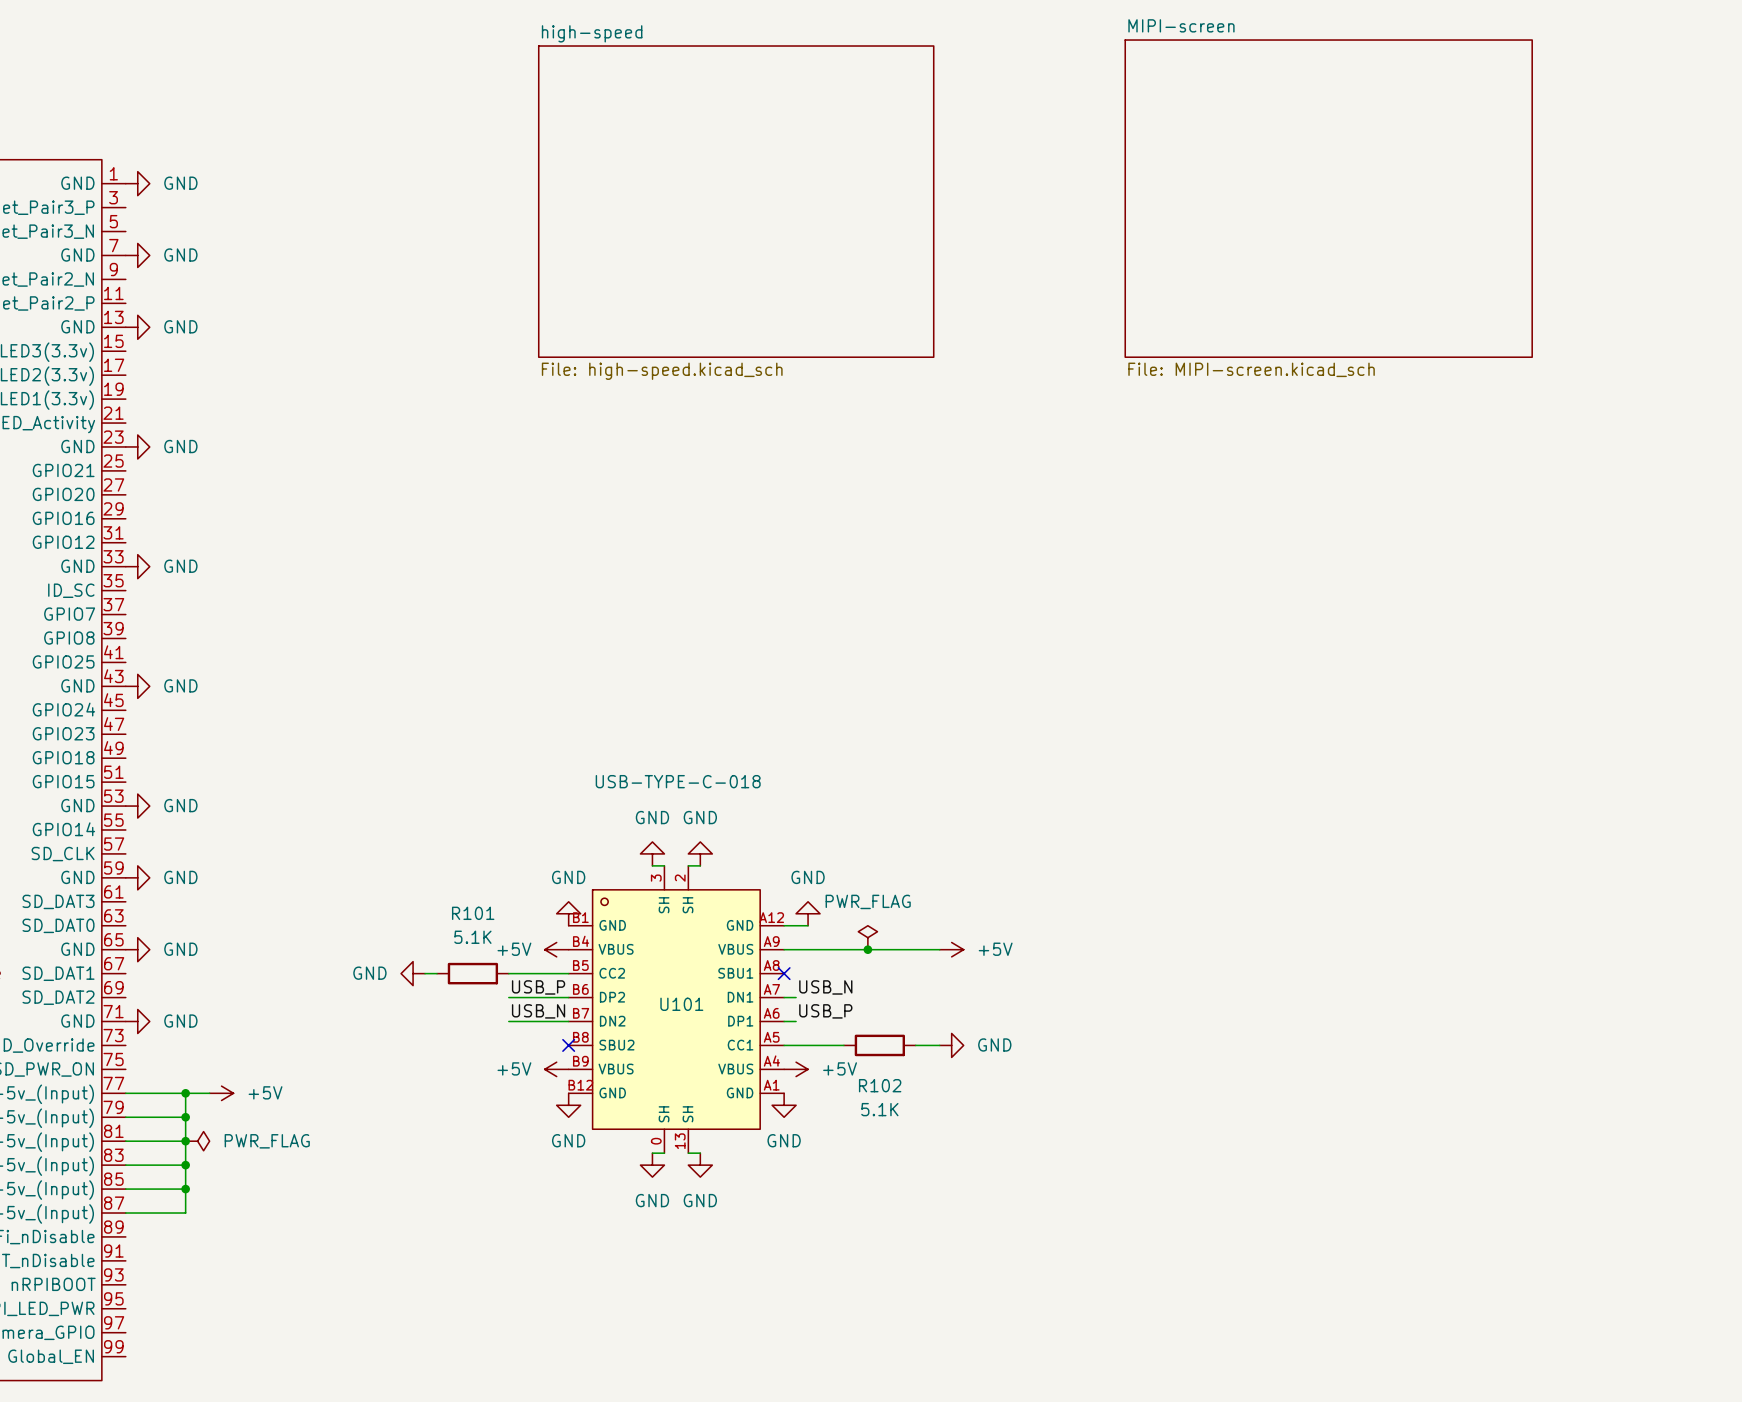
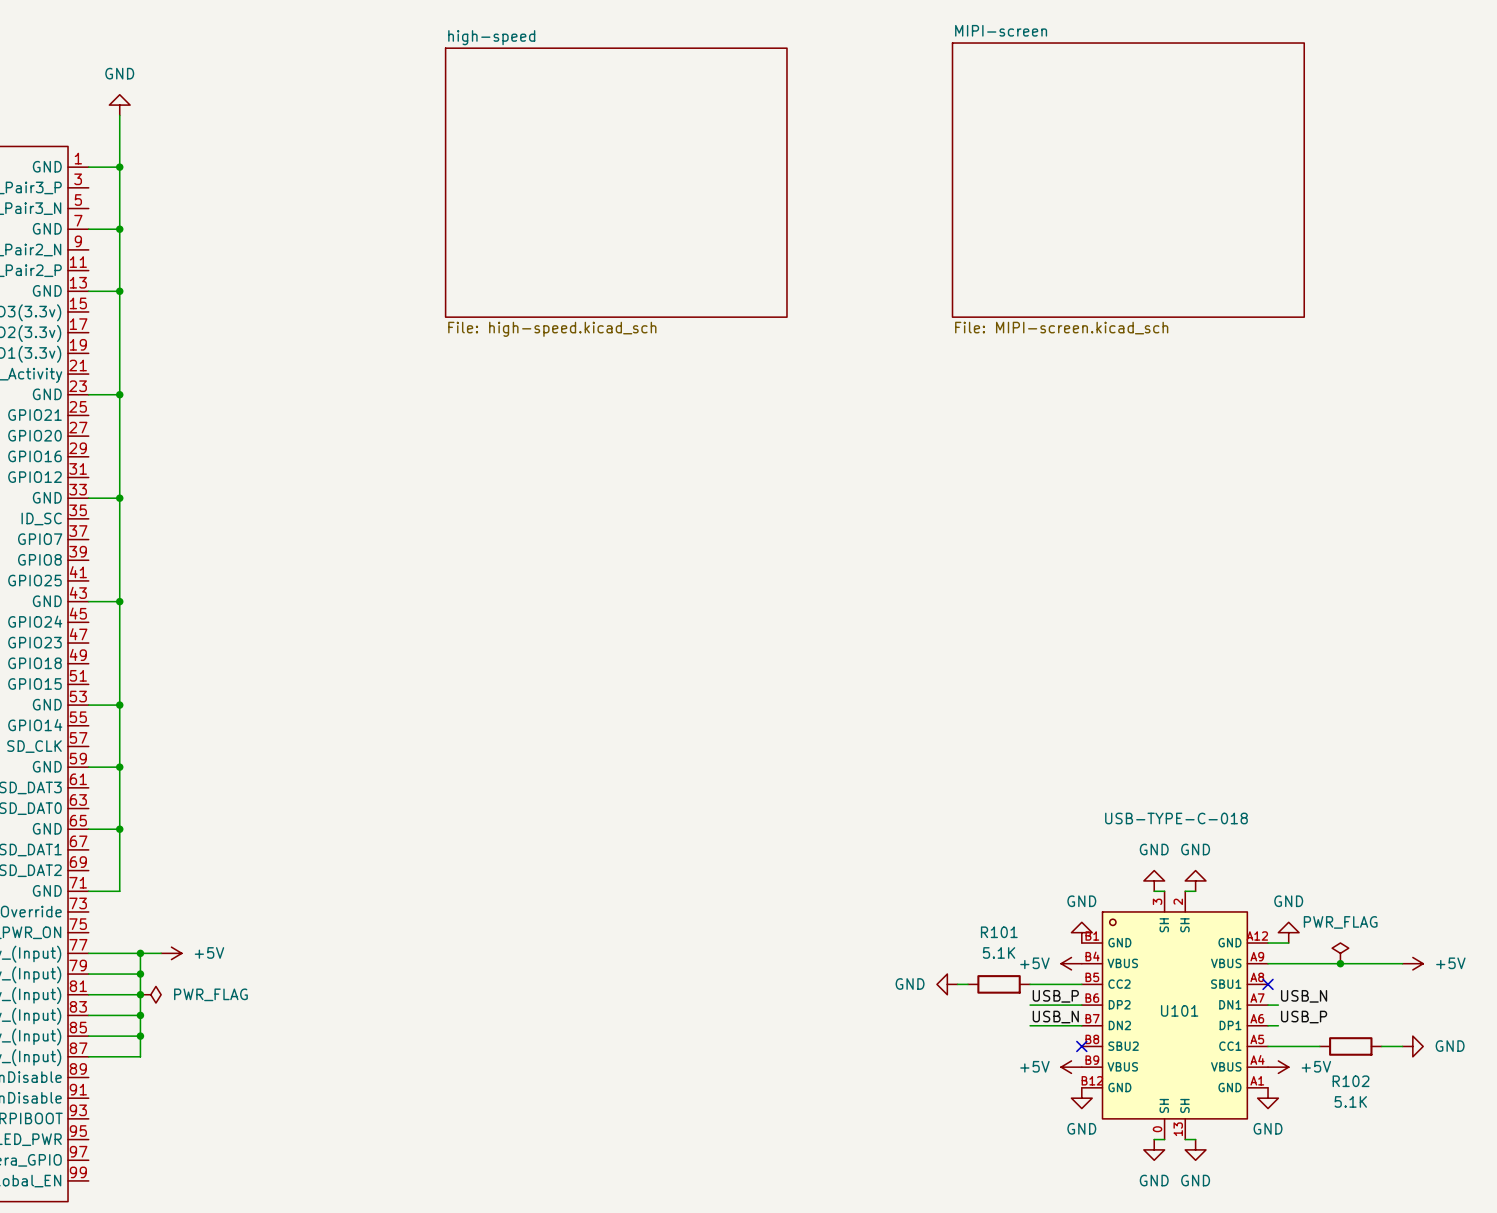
power symbol: none -> GND (119, 105)
wire: none -> (119, 115) (119, 891) (88, 891)
wire: none -> (88, 167) (119, 167)
power symbol: GND (137, 183) -> none
junction: none -> (119, 167)
wire: none -> (88, 229) (119, 229)
power symbol: GND (137, 255) -> none
junction: none -> (119, 229)
wire: none -> (88, 291) (119, 291)
power symbol: GND (137, 327) -> none
junction: none -> (119, 291)
wire: none -> (88, 394) (119, 394)
power symbol: GND (137, 446) -> none
junction: none -> (119, 394)
wire: none -> (88, 498) (119, 498)
power symbol: GND (137, 566) -> none
junction: none -> (119, 498)
wire: none -> (88, 601) (119, 601)
power symbol: GND (137, 686) -> none
junction: none -> (119, 601)
wire: none -> (88, 705) (119, 705)
power symbol: GND (137, 806) -> none
junction: none -> (119, 705)
power symbol: GND (652, 853) -> none
power symbol: GND (700, 853) -> none
wire: (652, 865) (664, 865) -> none
wire: (688, 865) (700, 865) -> none
wire: none -> (88, 767) (119, 767)
power symbol: GND (137, 877) -> none
junction: none -> (119, 767)
power symbol: GND (568, 913) -> none
power symbol: GND (808, 913) -> none
wire: (784, 925) (808, 925) -> none
power symbol: PWR_FLAG (867, 937) -> none
wire: none -> (88, 829) (119, 829)
power symbol: GND (137, 949) -> none
junction: none -> (119, 829)
power symbol: +5V (556, 949) -> none
wire: (784, 949) (939, 949) -> none
junction: (867, 949) -> none
power symbol: +5V (951, 949) -> none
power symbol: GND (413, 973) -> none
wire: (425, 973) (437, 973) -> none
R101 position: (472, 973) -> (999, 984)
wire: (508, 973) (568, 973) -> none
no-connect mark: (784, 973) -> none
label: USB_P (538, 987) -> none
label: USB_N (825, 987) -> none
wire: (508, 997) (568, 997) -> none
wire: (784, 997) (796, 997) -> none
U101 position: (676, 1009) -> (1174, 1015)
power symbol: none -> GND (1154, 880)
power symbol: none -> GND (1195, 880)
label: USB_N (538, 1011) -> none
label: USB_P (825, 1011) -> none
power symbol: GND (137, 1021) -> none
wire: (508, 1021) (568, 1021) -> none
wire: (784, 1021) (796, 1021) -> none
wire: none -> (1154, 891) (1164, 891)
wire: none -> (1185, 891) (1195, 891)
no-connect mark: (568, 1045) -> none
wire: (784, 1045) (843, 1045) -> none
R102 position: (879, 1045) -> (1350, 1046)
wire: (915, 1045) (939, 1045) -> none
power symbol: GND (951, 1045) -> none
power symbol: +5V (556, 1069) -> none
power symbol: +5V (796, 1069) -> none
power symbol: none -> GND (1081, 932)
power symbol: none -> GND (1288, 932)
wire: none -> (1268, 943) (1288, 943)
power symbol: none -> PWR_FLAG (1340, 953)
power symbol: GND (568, 1105) -> none
power symbol: GND (784, 1105) -> none
power symbol: none -> +5V (1071, 963)
wire: none -> (1268, 963) (1402, 963)
junction: none -> (1340, 963)
power symbol: none -> +5V (1412, 963)
power symbol: none -> GND (947, 984)
wire: none -> (957, 984) (968, 984)
wire: none -> (1030, 984) (1081, 984)
no-connect mark: none -> (1268, 984)
label: none -> USB_P (1055, 996)
label: none -> USB_N (1304, 996)
wire: (652, 1153) (664, 1153) -> none
wire: (688, 1153) (700, 1153) -> none
wire: none -> (1030, 1005) (1081, 1005)
wire: none -> (1268, 1005) (1278, 1005)
power symbol: GND (652, 1165) -> none
power symbol: GND (700, 1165) -> none
label: none -> USB_N (1055, 1017)
label: none -> USB_P (1304, 1017)
wire: none -> (1030, 1025) (1081, 1025)
wire: none -> (1268, 1025) (1278, 1025)
no-connect mark: none -> (1081, 1046)
wire: none -> (1268, 1046) (1319, 1046)
wire: none -> (1381, 1046) (1402, 1046)
power symbol: none -> GND (1412, 1046)
power symbol: none -> +5V (1071, 1067)
power symbol: none -> +5V (1278, 1067)
power symbol: none -> GND (1081, 1098)
power symbol: none -> GND (1268, 1098)
wire: none -> (1154, 1139) (1164, 1139)
wire: none -> (1185, 1139) (1195, 1139)
power symbol: none -> GND (1154, 1149)
power symbol: none -> GND (1195, 1149)

